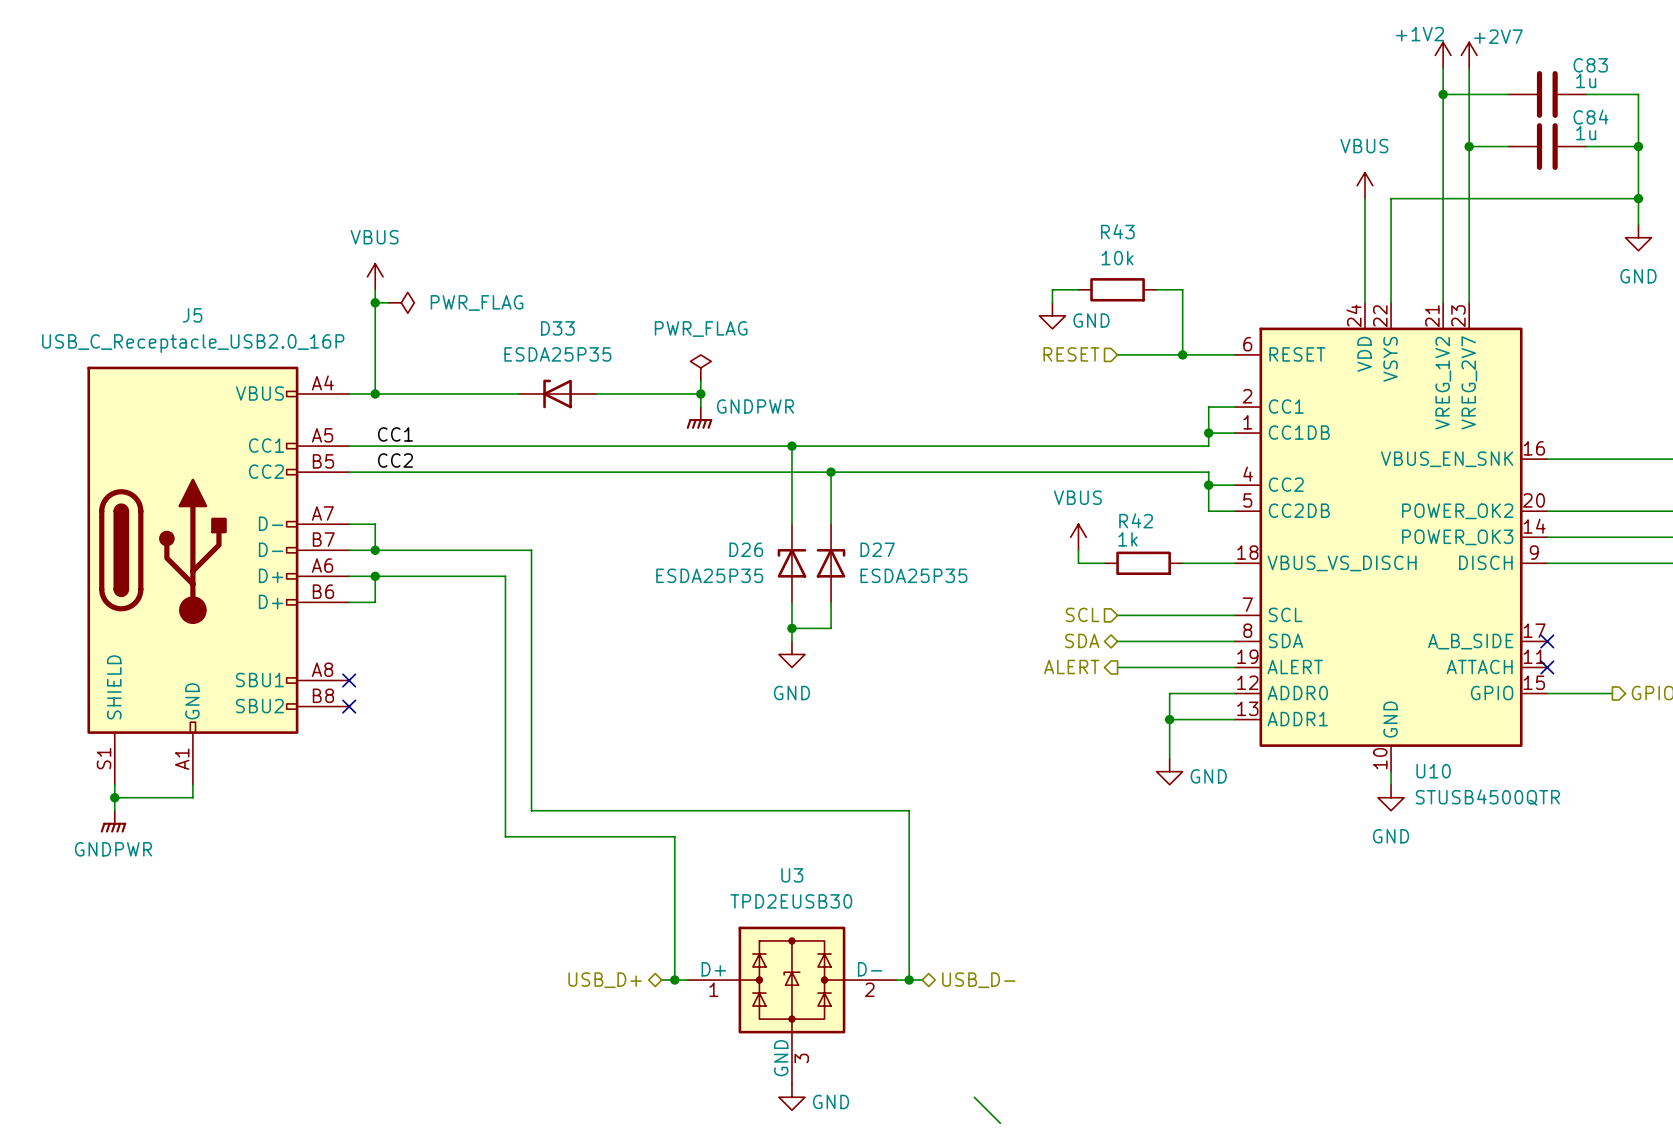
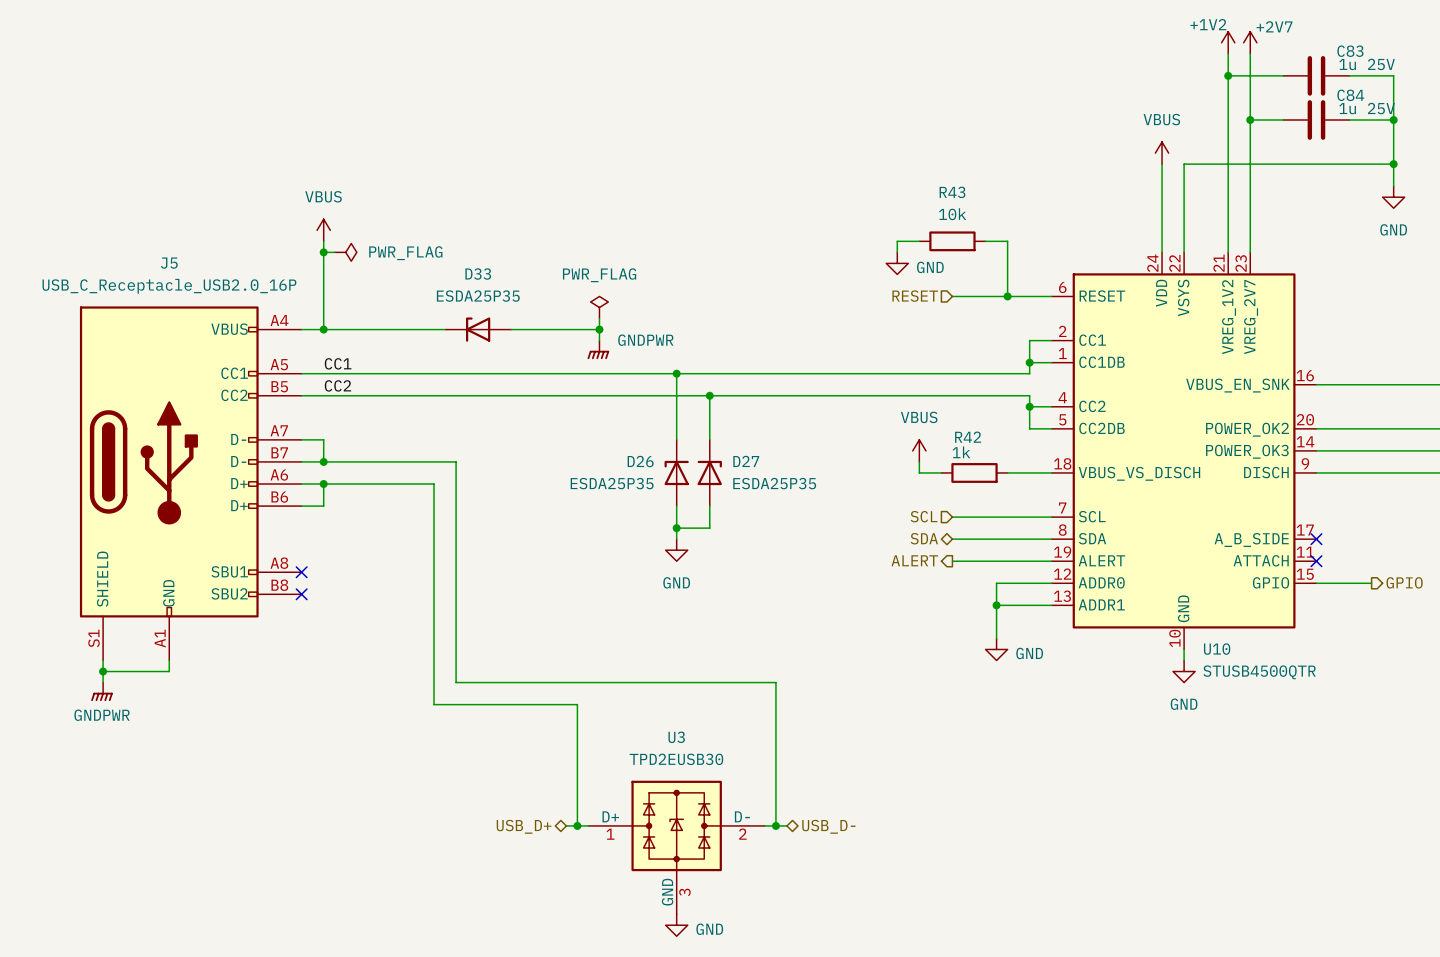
C83 value: 1u (1586, 80) -> 1u 25V (1367, 64)
C84 value: 1u (1586, 133) -> 1u 25V (1367, 108)
wire: (974, 1097) (1000, 1123) -> none

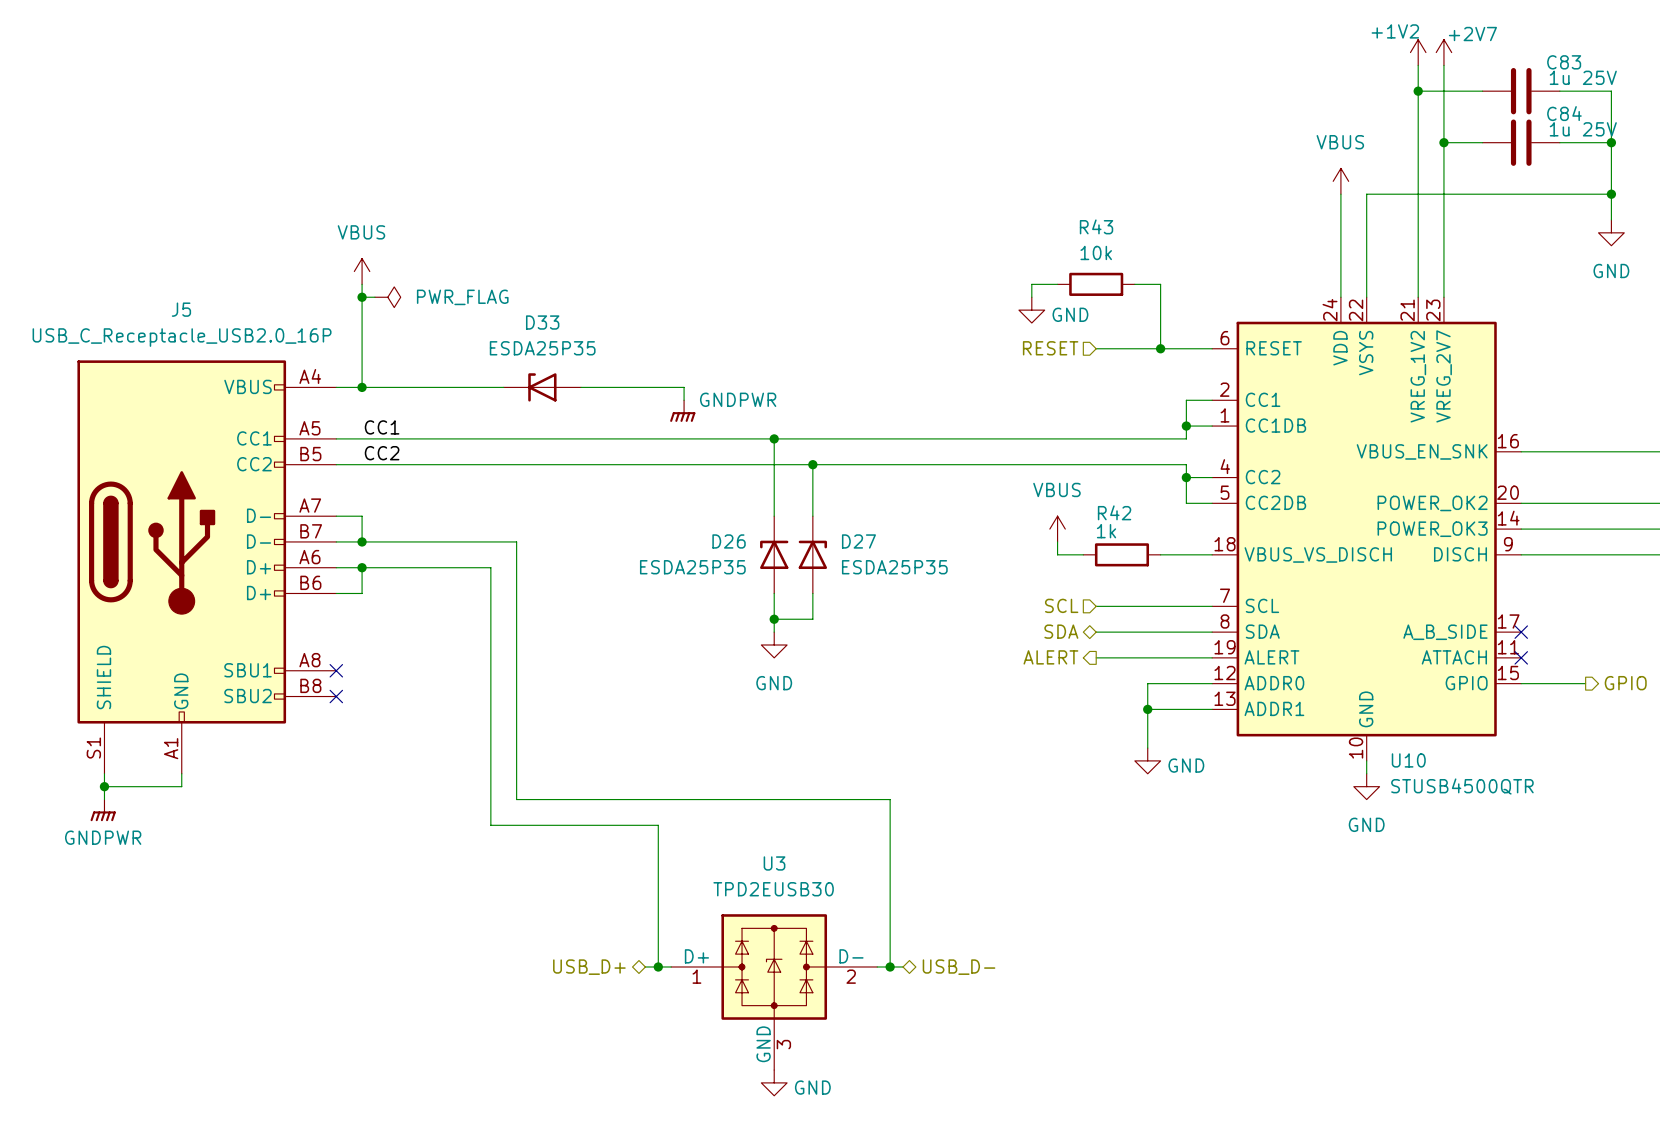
power symbol: PWR_FLAG (599, 307) -> none
wire: (599, 318) (599, 329) -> none
junction: (599, 329) -> none

